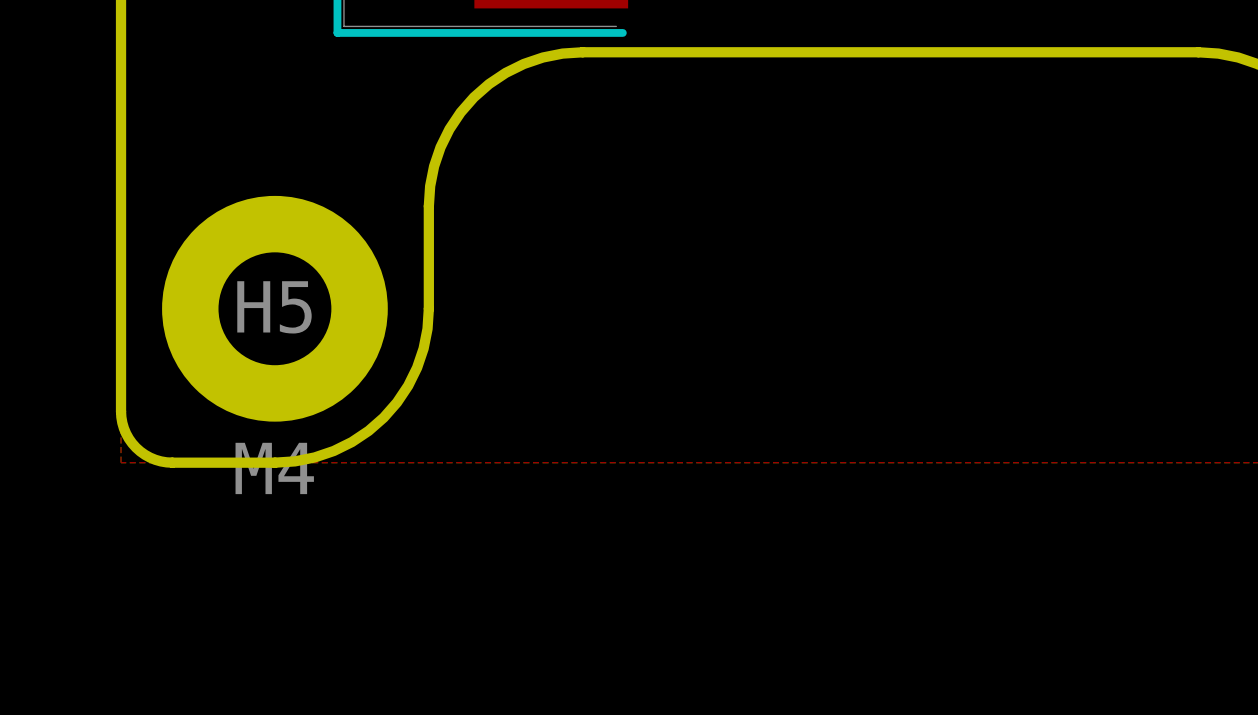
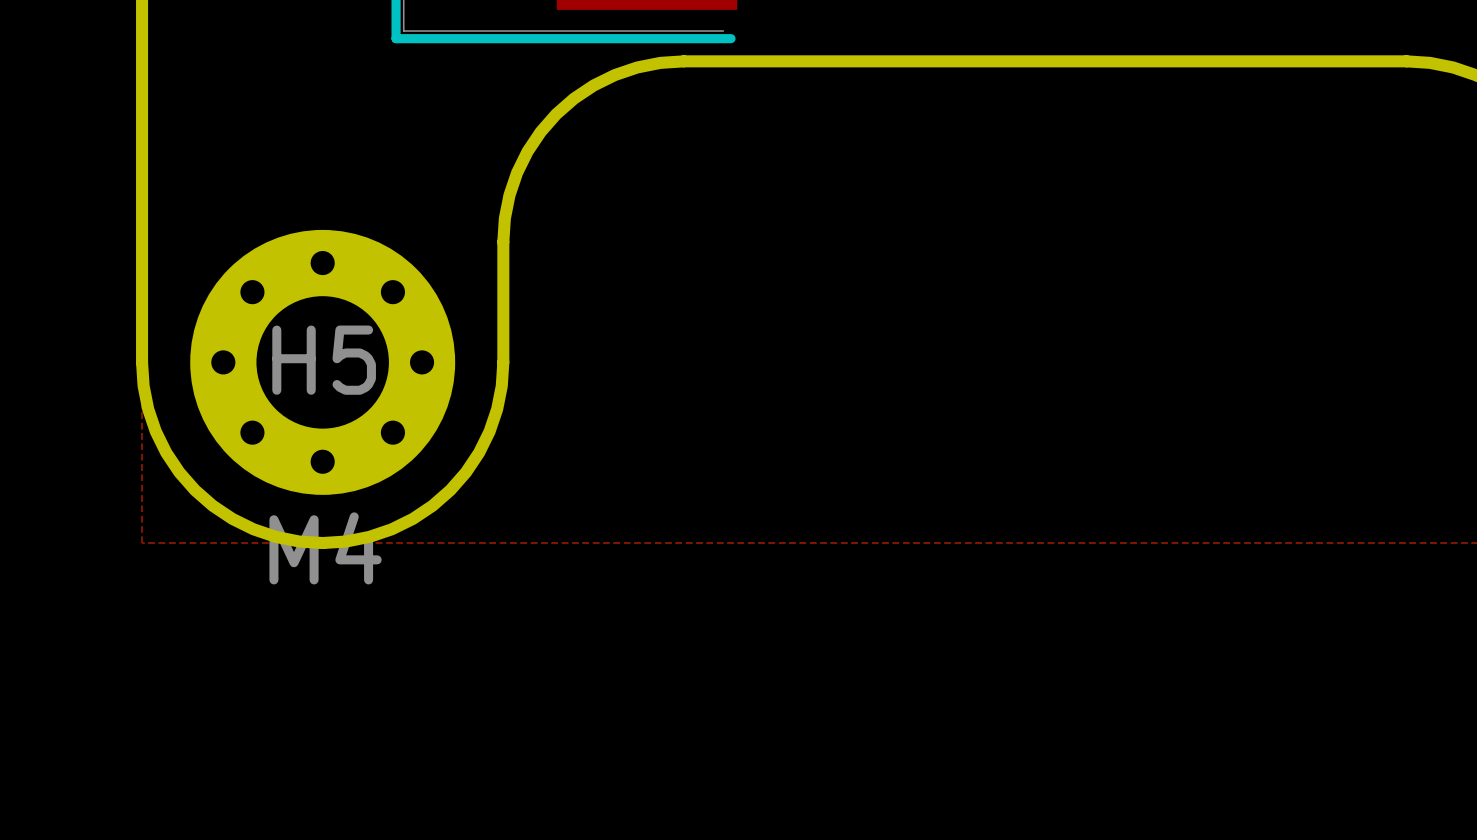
H5 footprint: [162, 195, 388, 422] -> [190, 229, 456, 495]
board edge: (121, 308) (121, 417) (126, 433) (136, 447) (150, 457) (166, 462) (274, 462) -> (142, 362) (143, 385) (148, 409) (155, 431) (166, 452) (179, 472) (194, 490) (212, 505) (232, 518) (253, 529) (275, 536) (299, 541) (322, 543)

